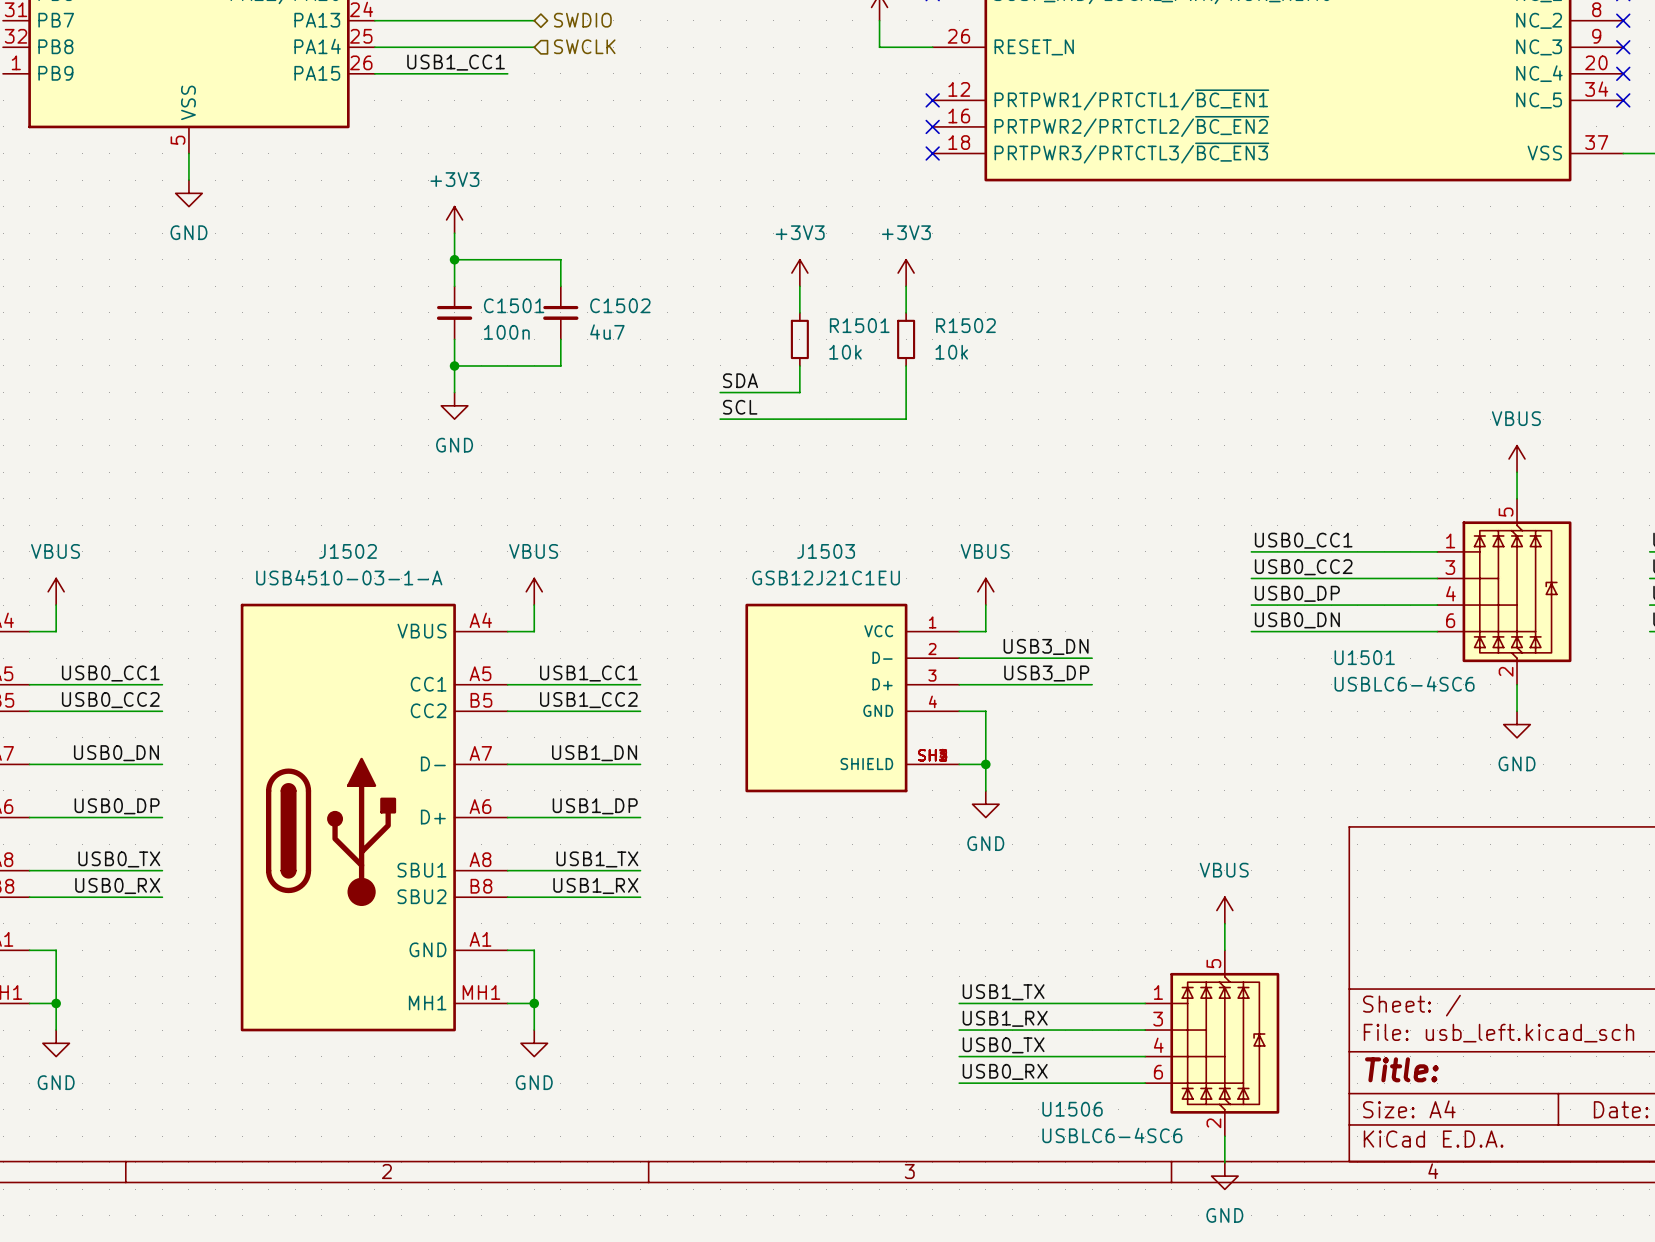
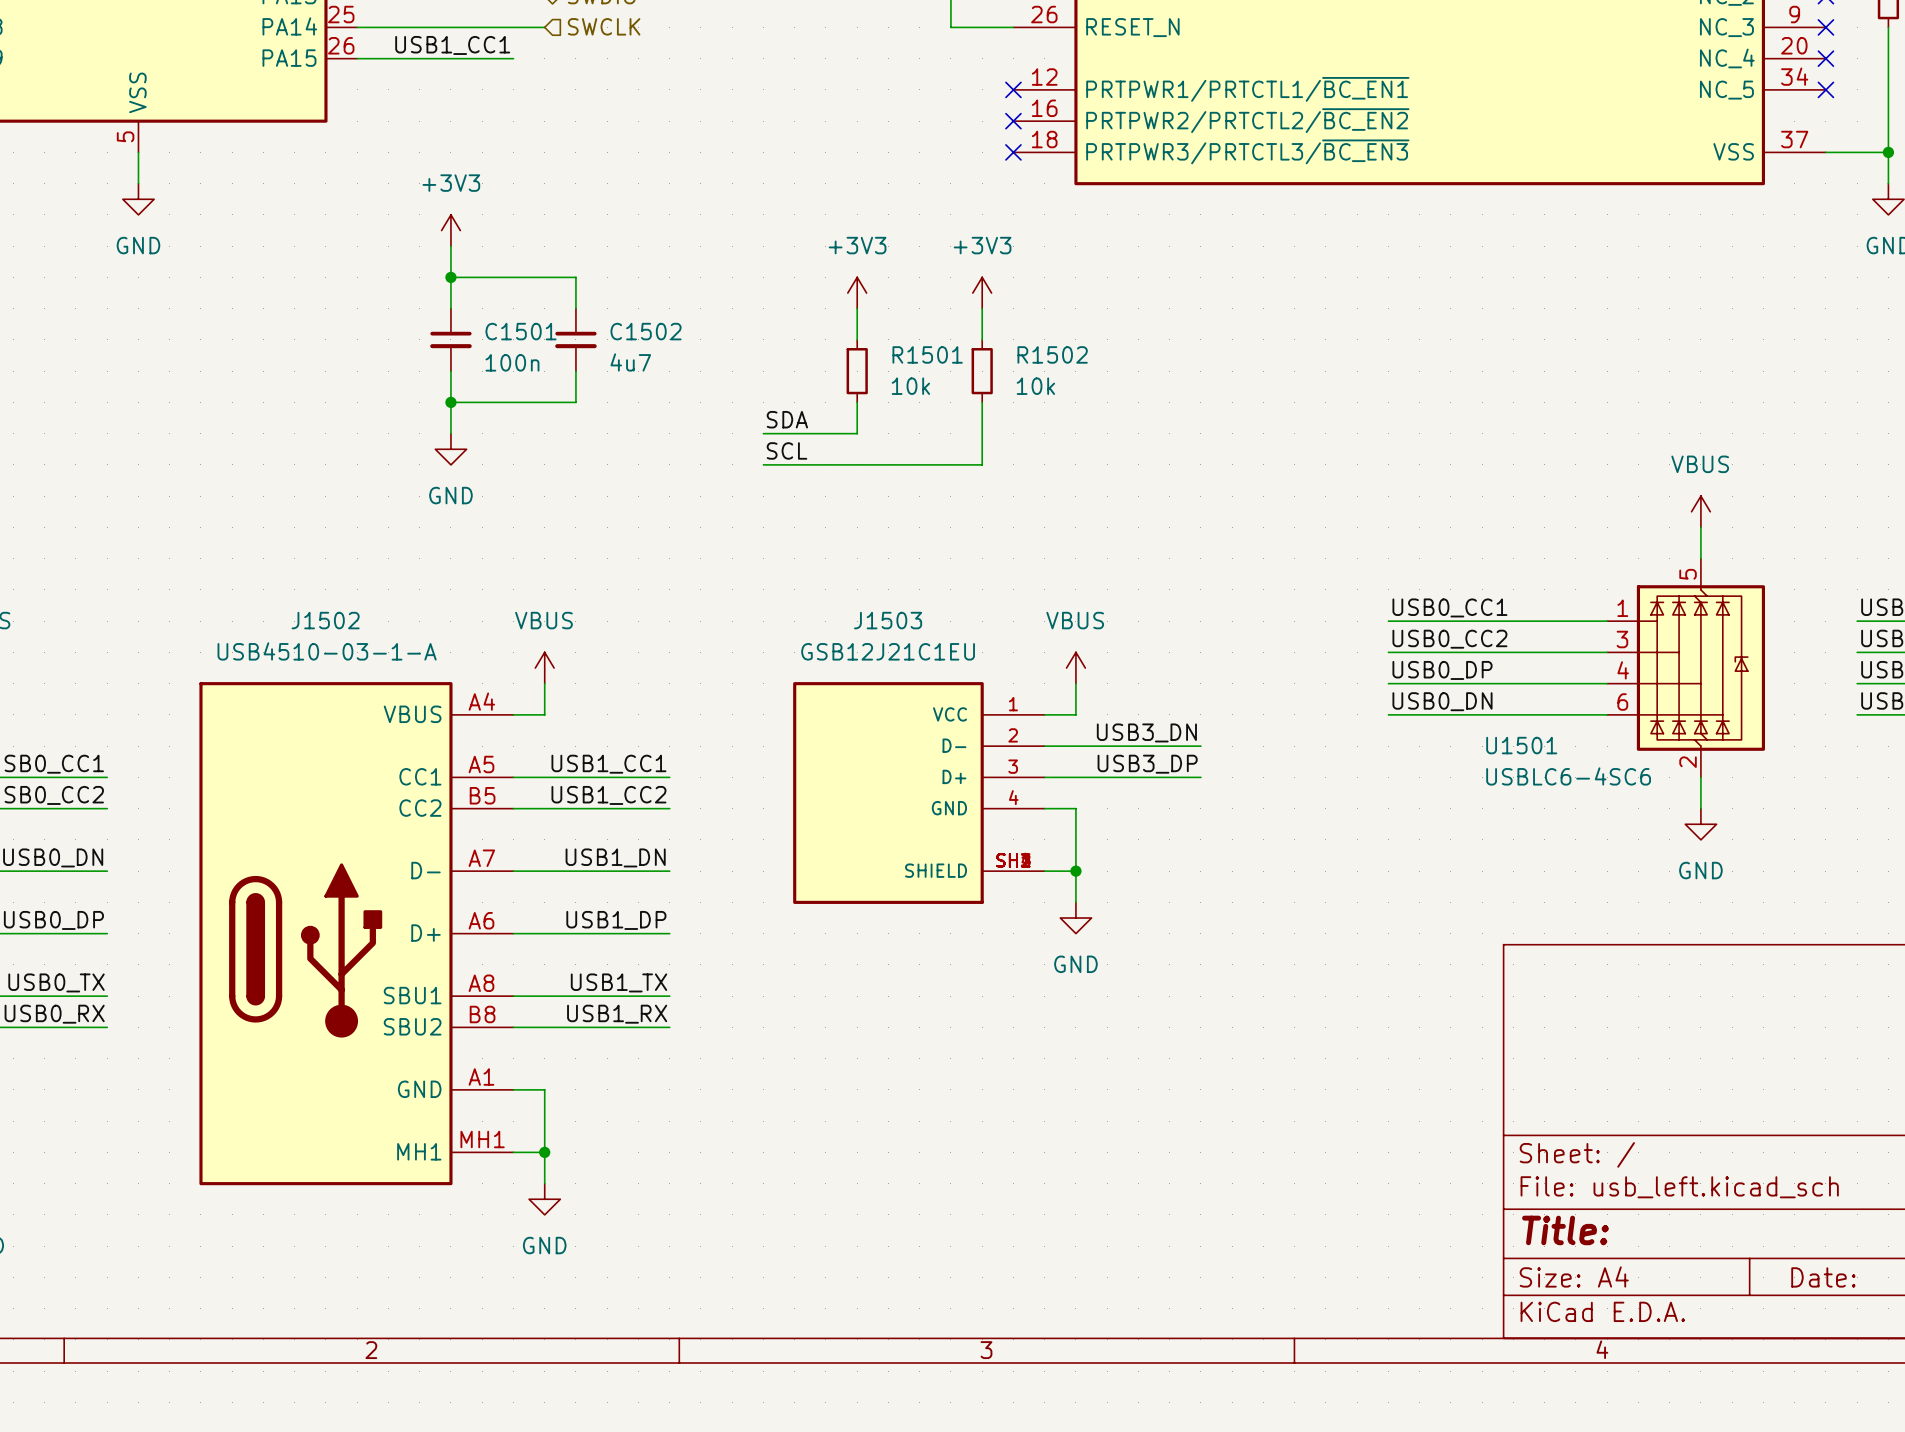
power symbol: VBUS (1224, 910) -> none
wire: (1224, 923) (1224, 950) -> none
label: USB1_TX (1003, 992) -> none
wire: (959, 1003) (1145, 1003) -> none
label: USB1_RX (1005, 1018) -> none
wire: (959, 1030) (1145, 1030) -> none
U1506: USBLC6-4SC6 (1212, 1043) -> none
label: USB0_TX (1003, 1045) -> none
wire: (959, 1056) (1145, 1056) -> none
label: USB0_RX (1005, 1071) -> none
wire: (959, 1083) (1145, 1083) -> none
wire: (1224, 1136) (1224, 1162) -> none
power symbol: GND (1224, 1176) -> none

